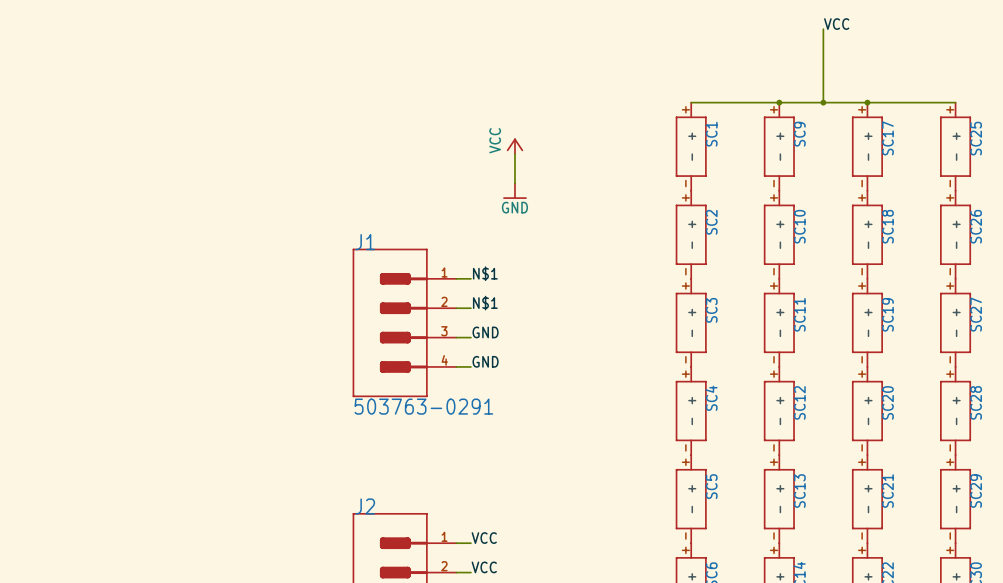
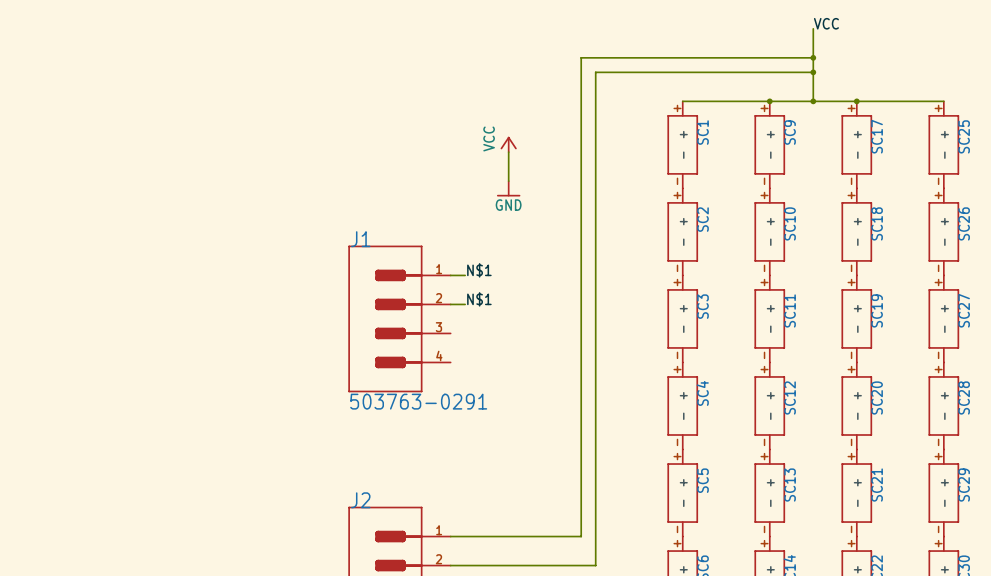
wire: none -> (813, 57) (581, 57) (581, 536) (465, 536)
junction: none -> (813, 57)
wire: none -> (813, 72) (595, 72) (595, 565) (465, 565)
junction: none -> (813, 72)
label: GND (485, 332) -> none
wire: (456, 337) (470, 337) -> none
label: GND (485, 361) -> none
wire: (456, 366) (470, 366) -> none
label: VCC (484, 538) -> none
label: VCC (484, 567) -> none

